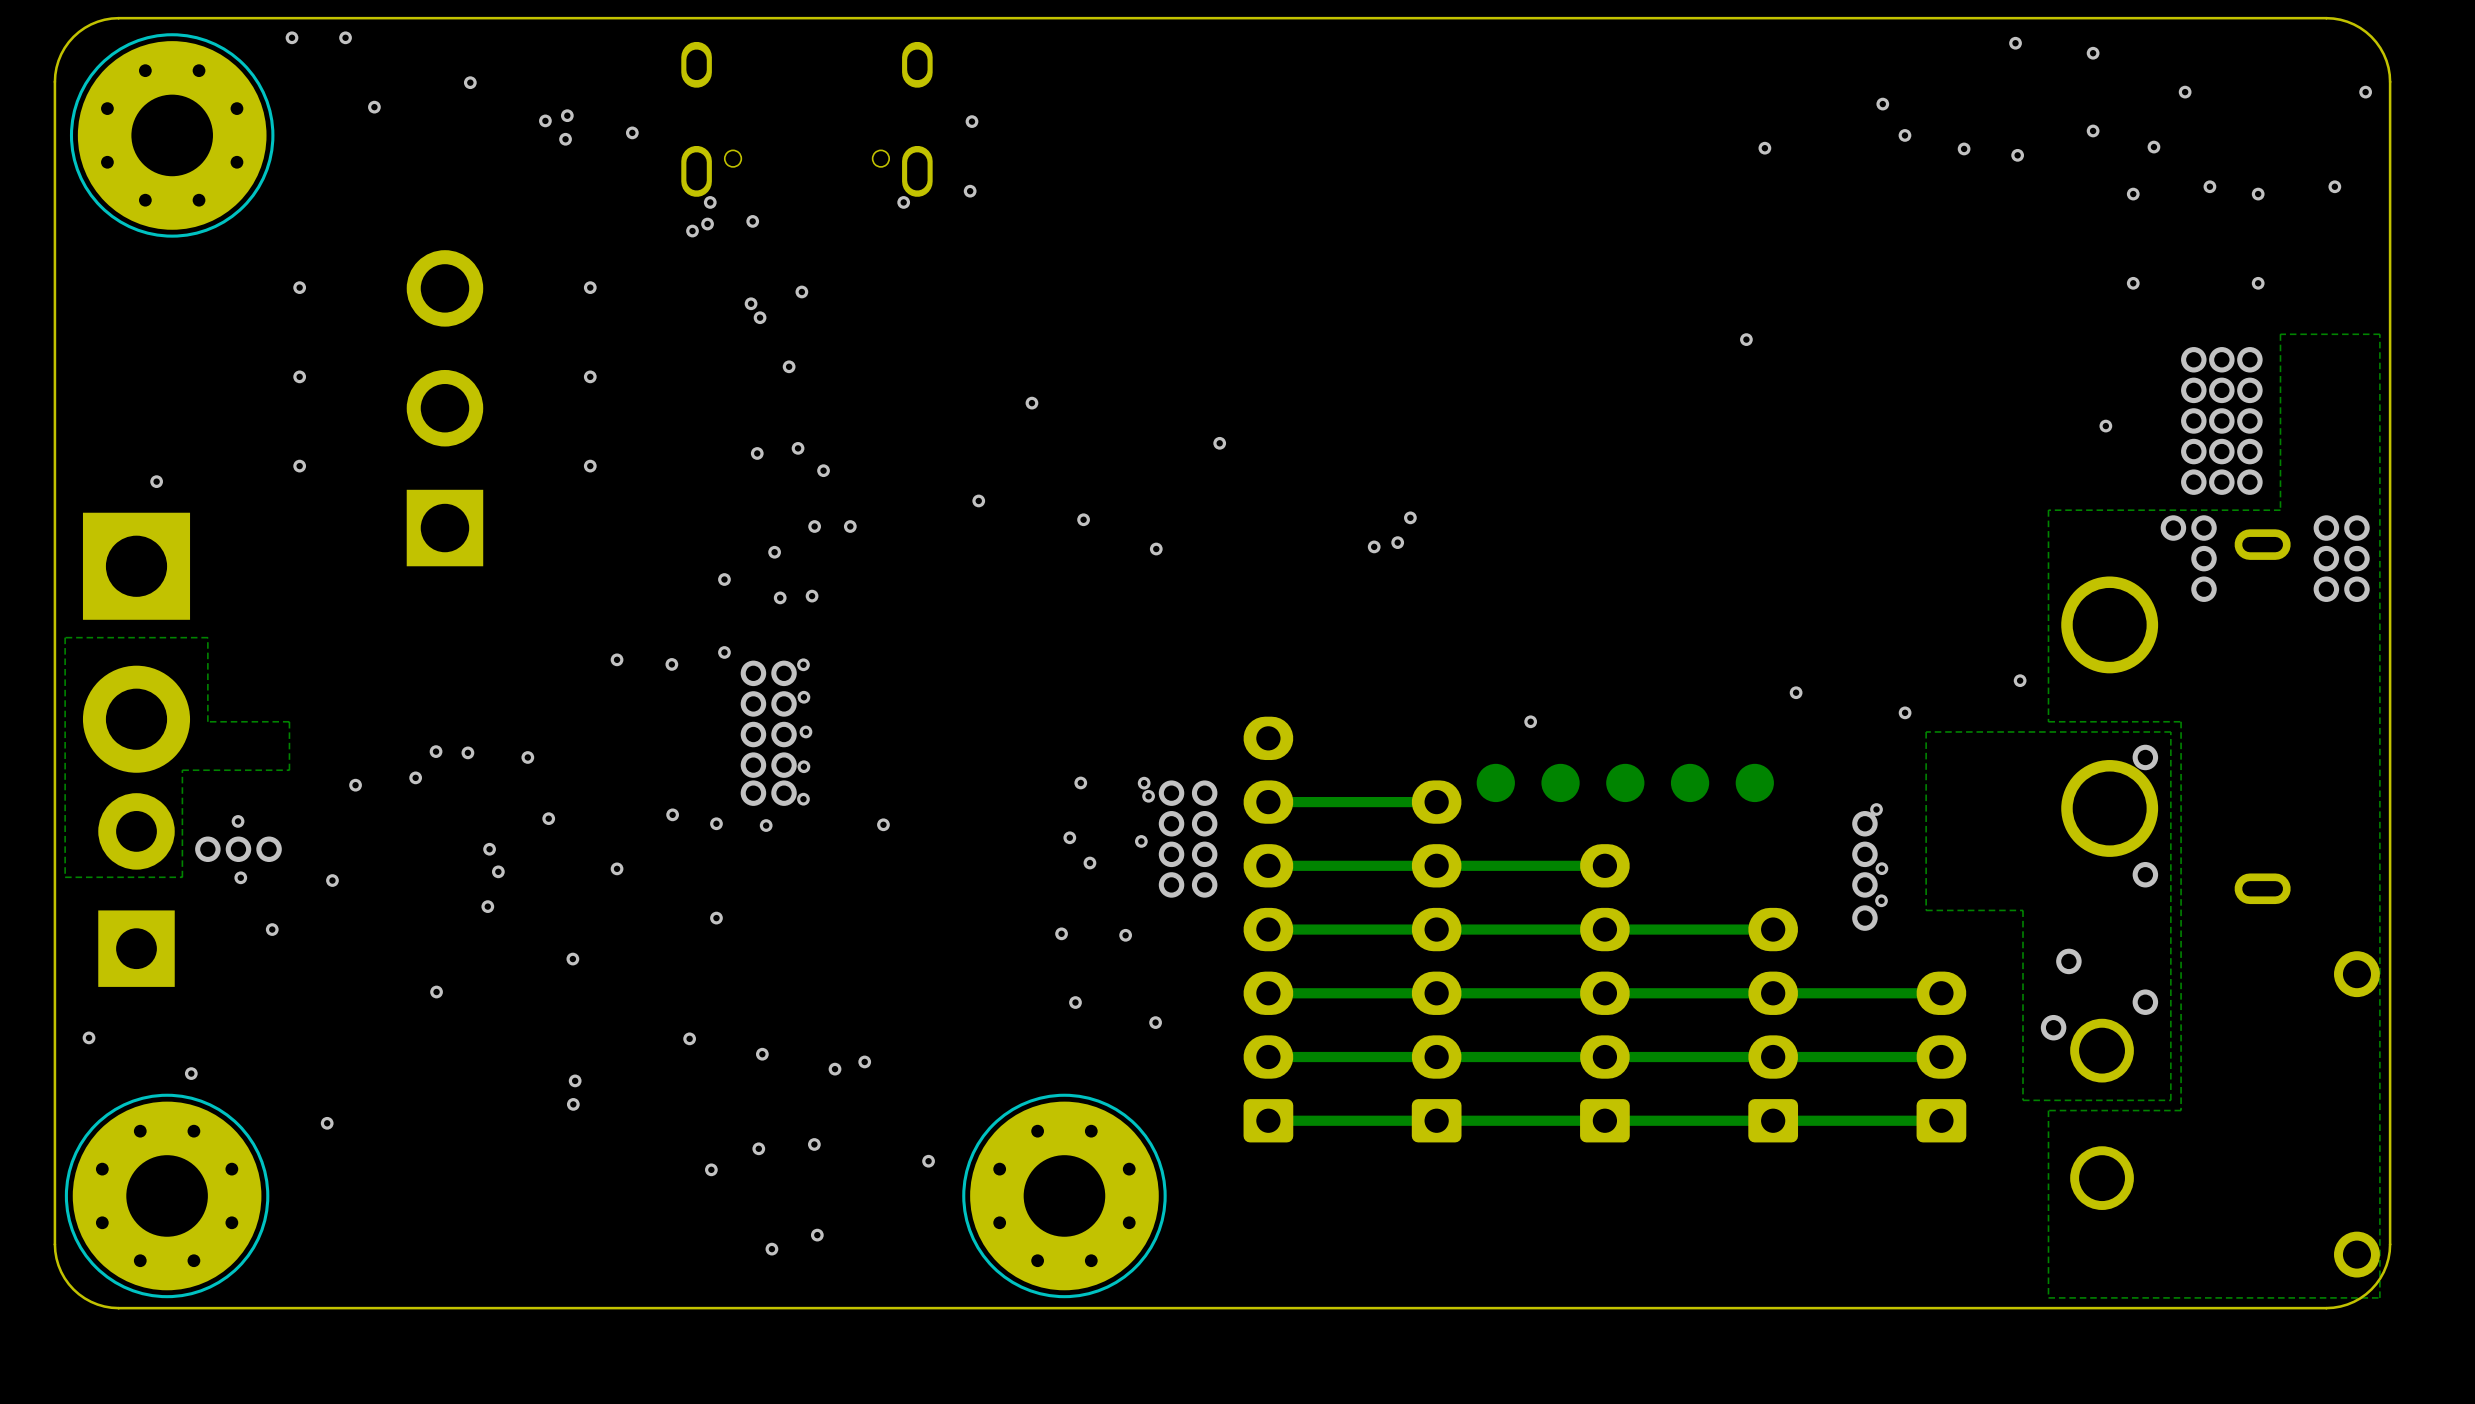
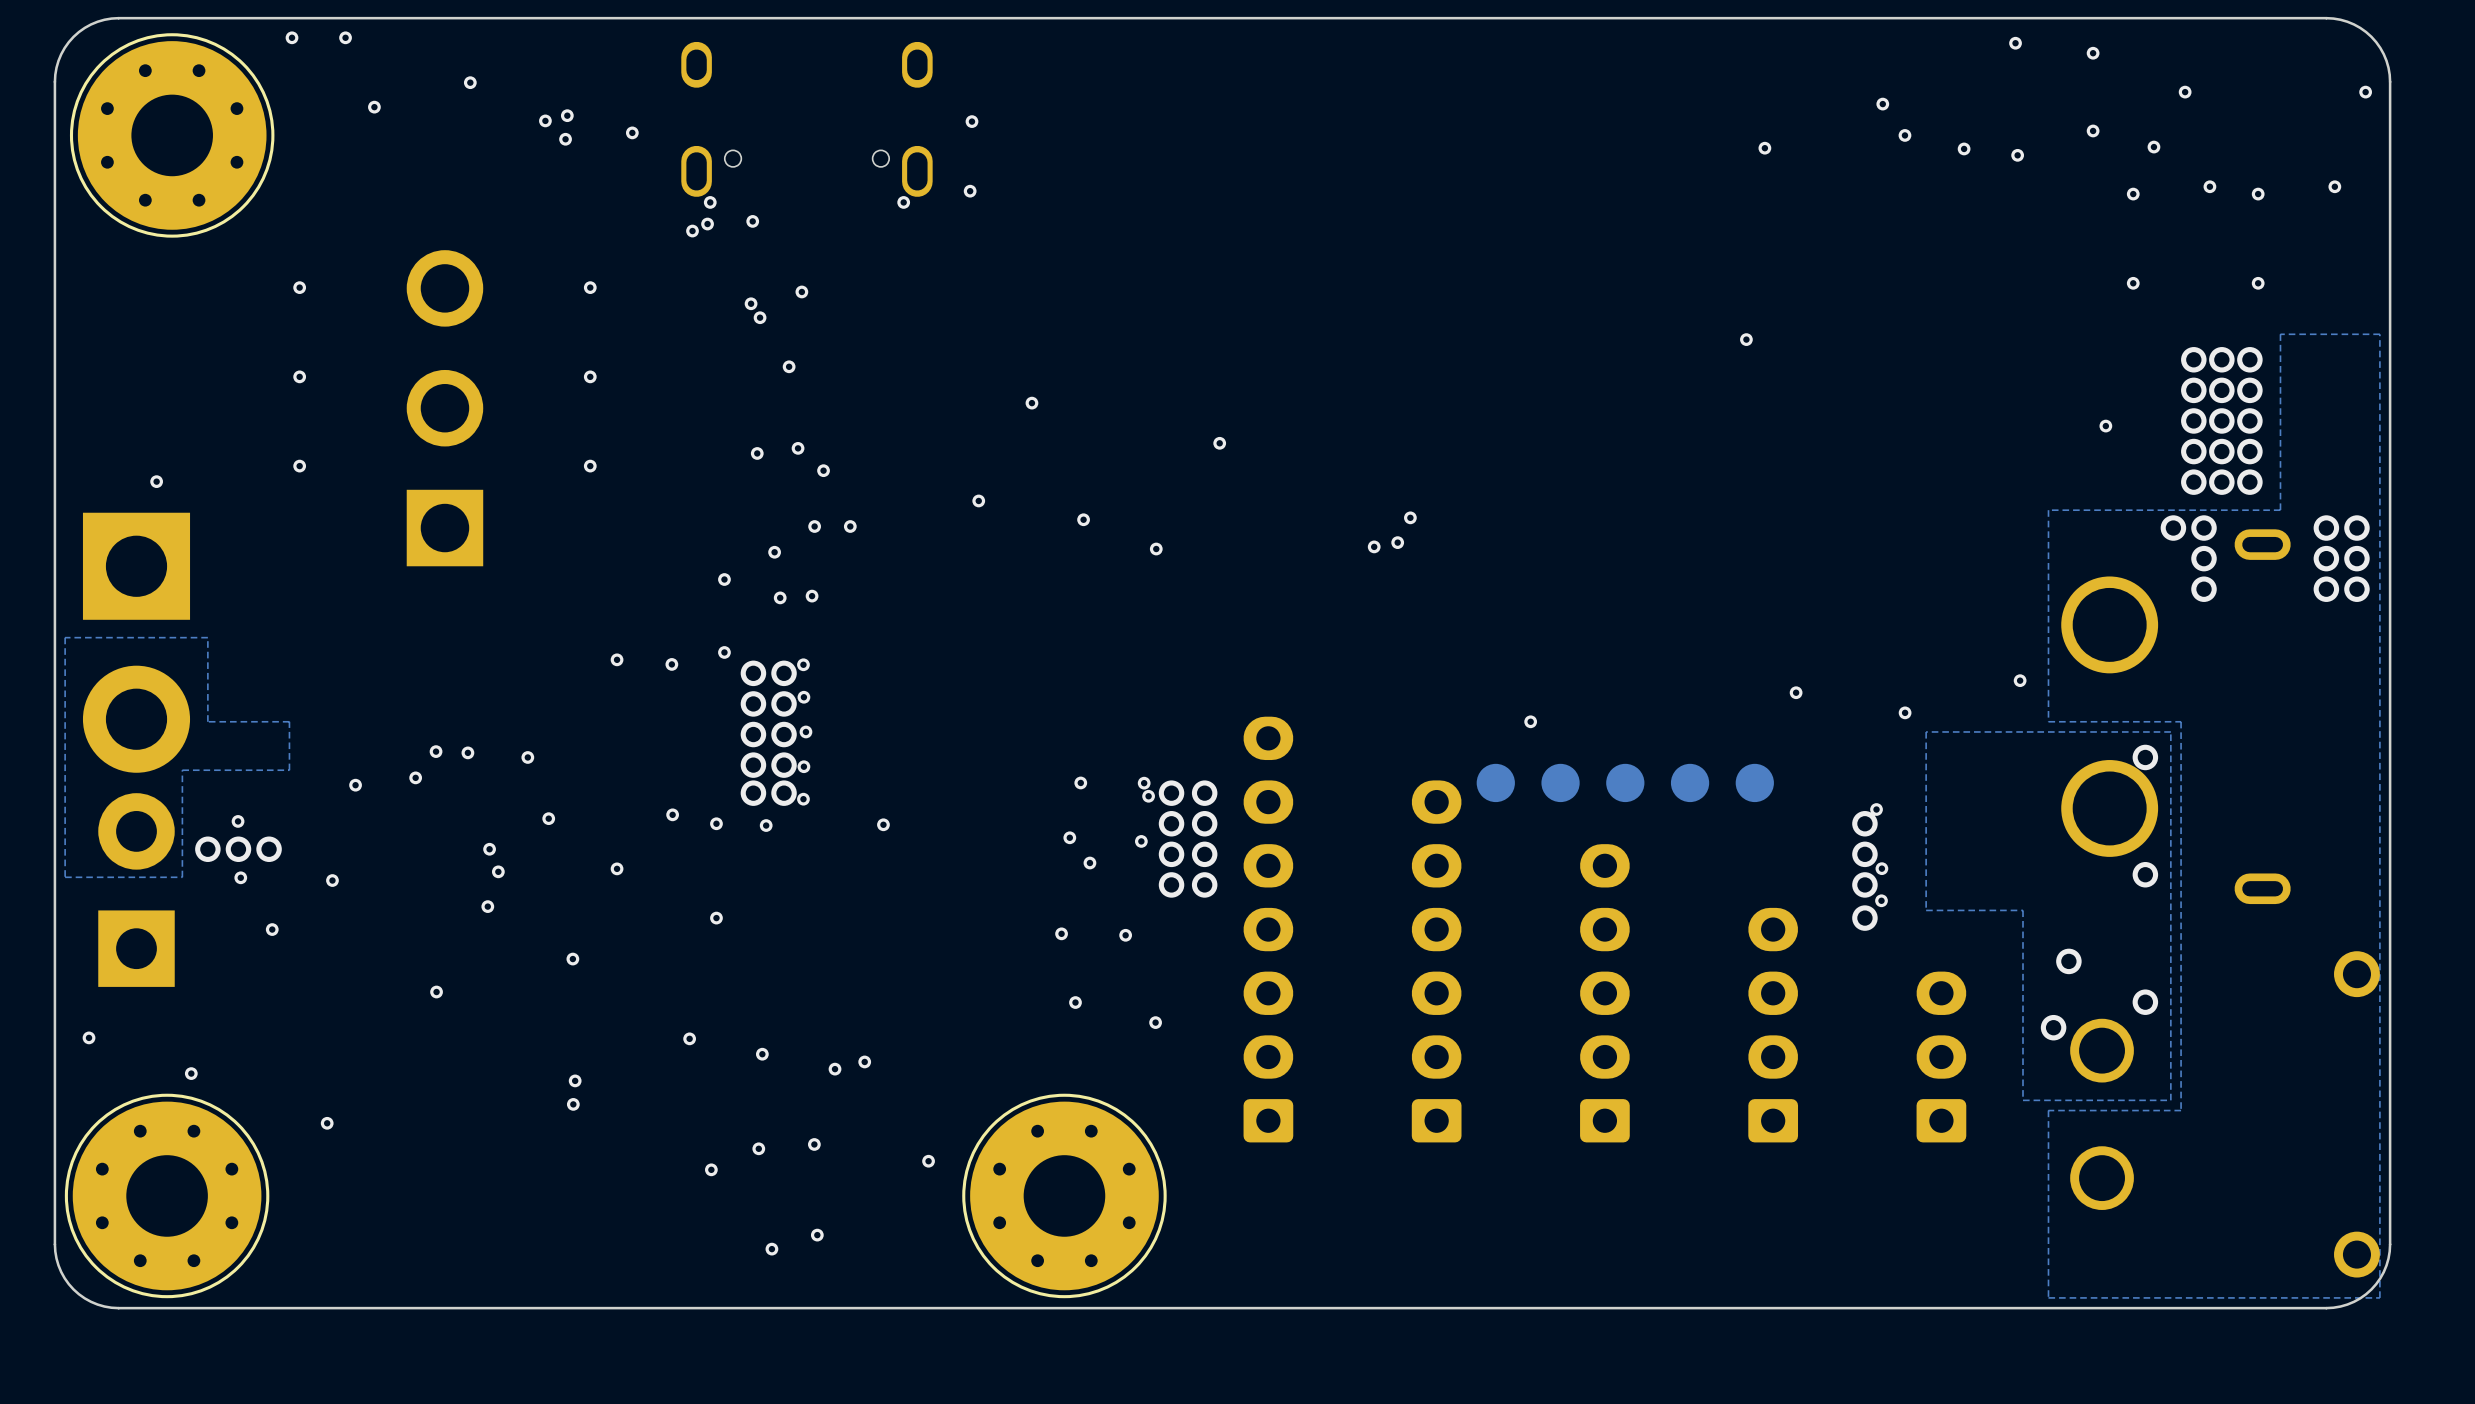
track: (1436, 802) (1268, 802) -> none
track: (1604, 865) (1268, 865) -> none
track: (1773, 929) (1268, 929) -> none
track: (1941, 993) (1268, 993) -> none
track: (1941, 1057) (1268, 1057) -> none
track: (1941, 1120) (1268, 1120) -> none

